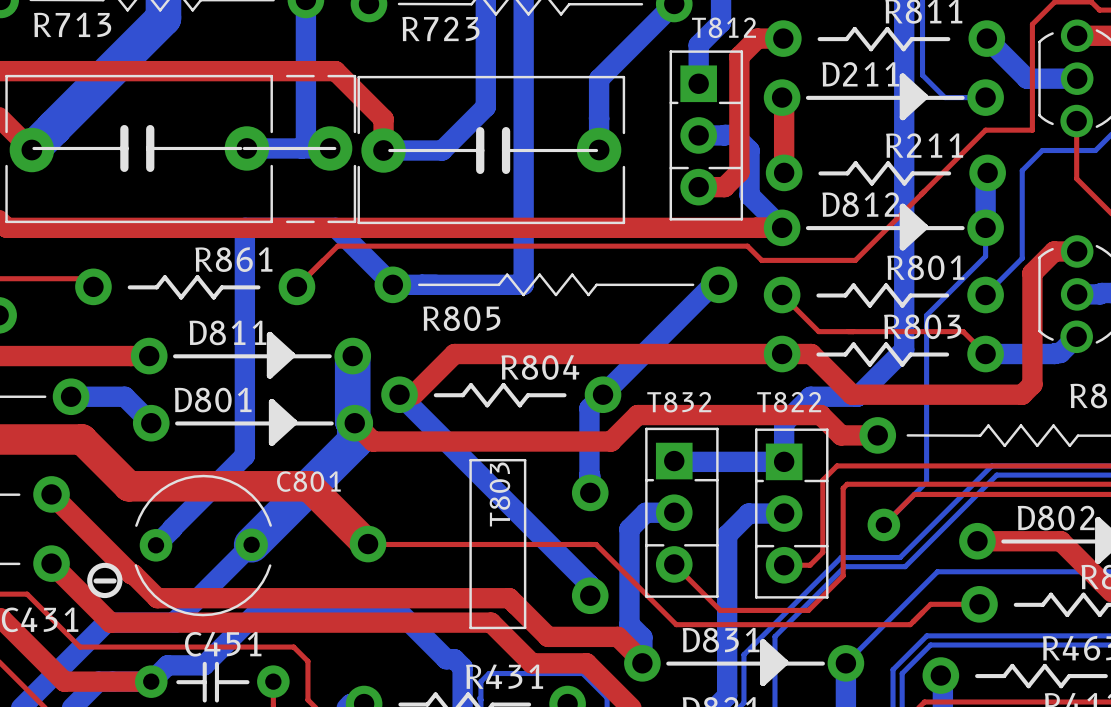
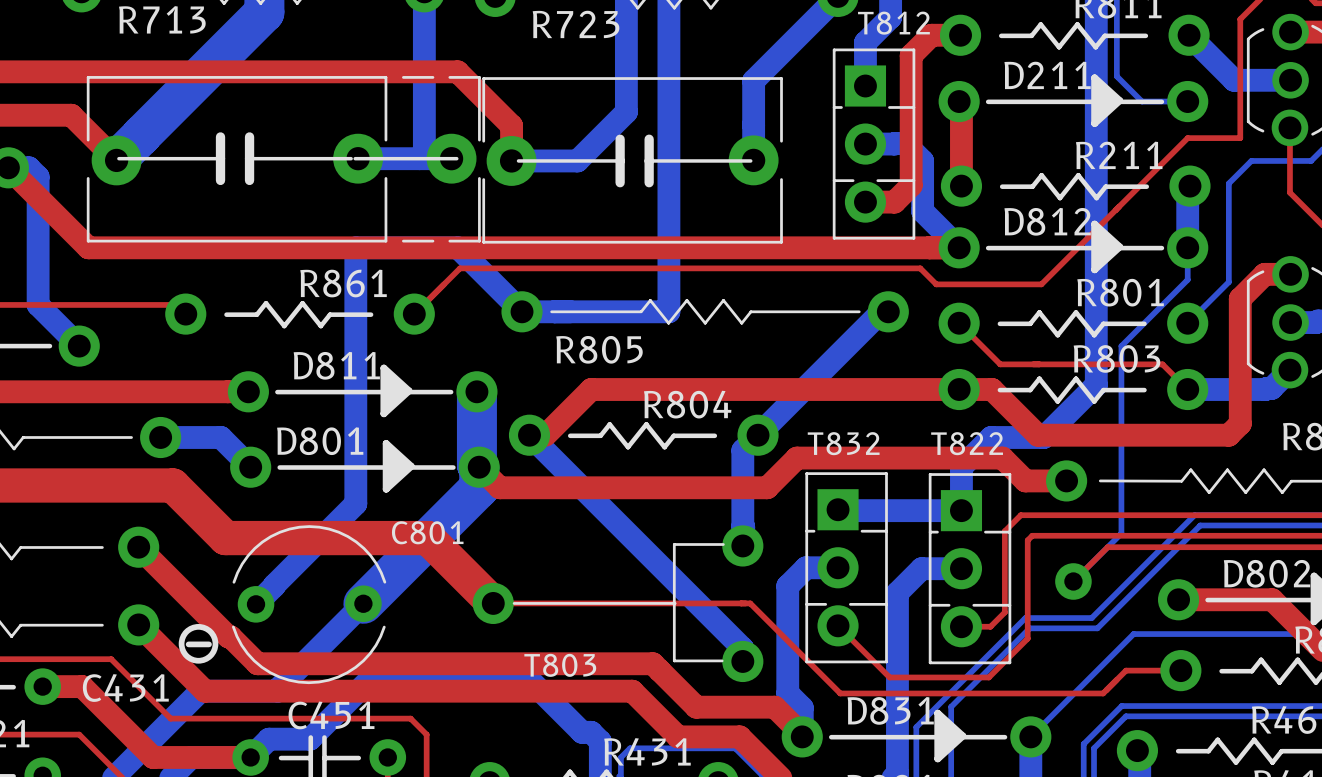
T803 footprint: [349, 458, 609, 630] -> [472, 525, 764, 683]
T803 name position: T803 (499, 494) -> T803 (560, 665)

